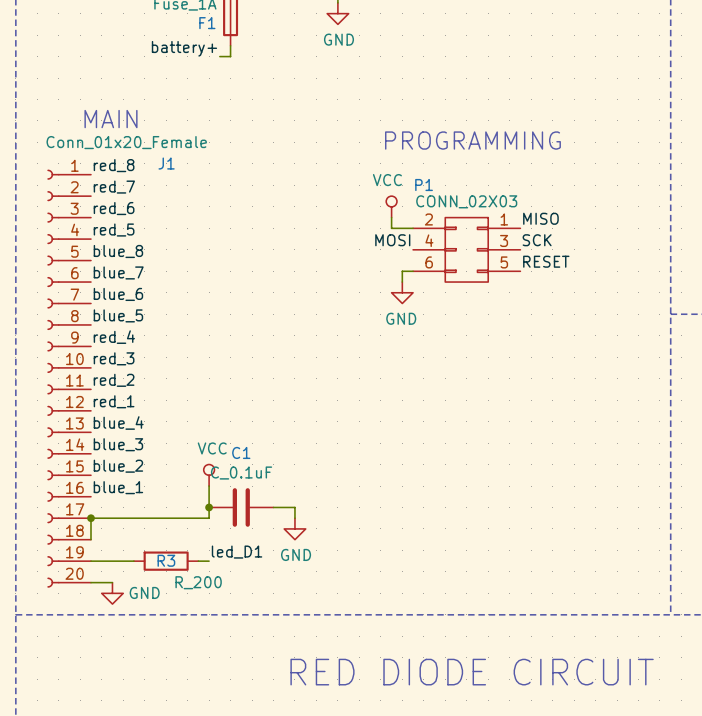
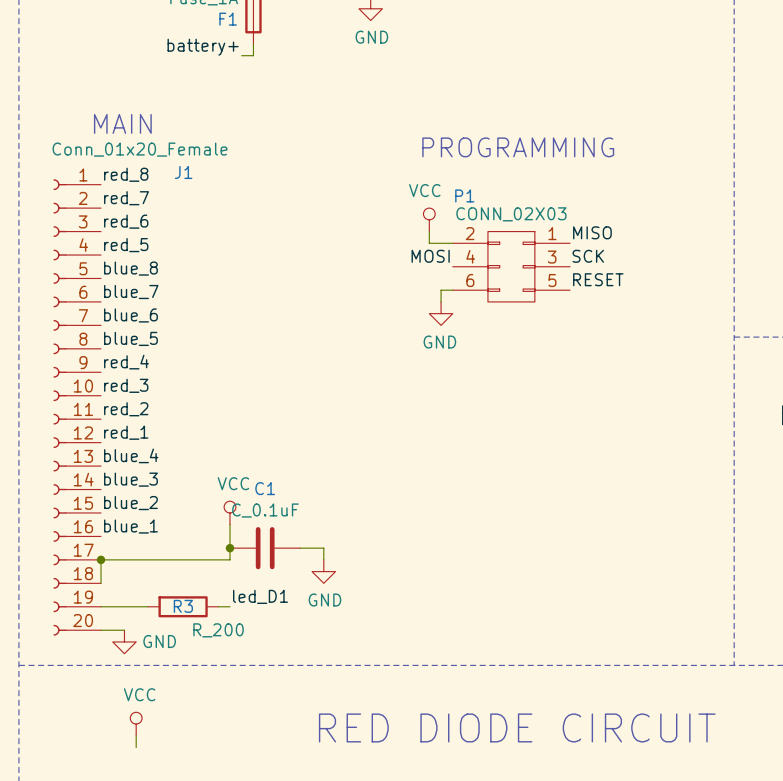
power symbol: none -> VCC (136, 724)
wire: none -> (136, 735) (136, 747)

